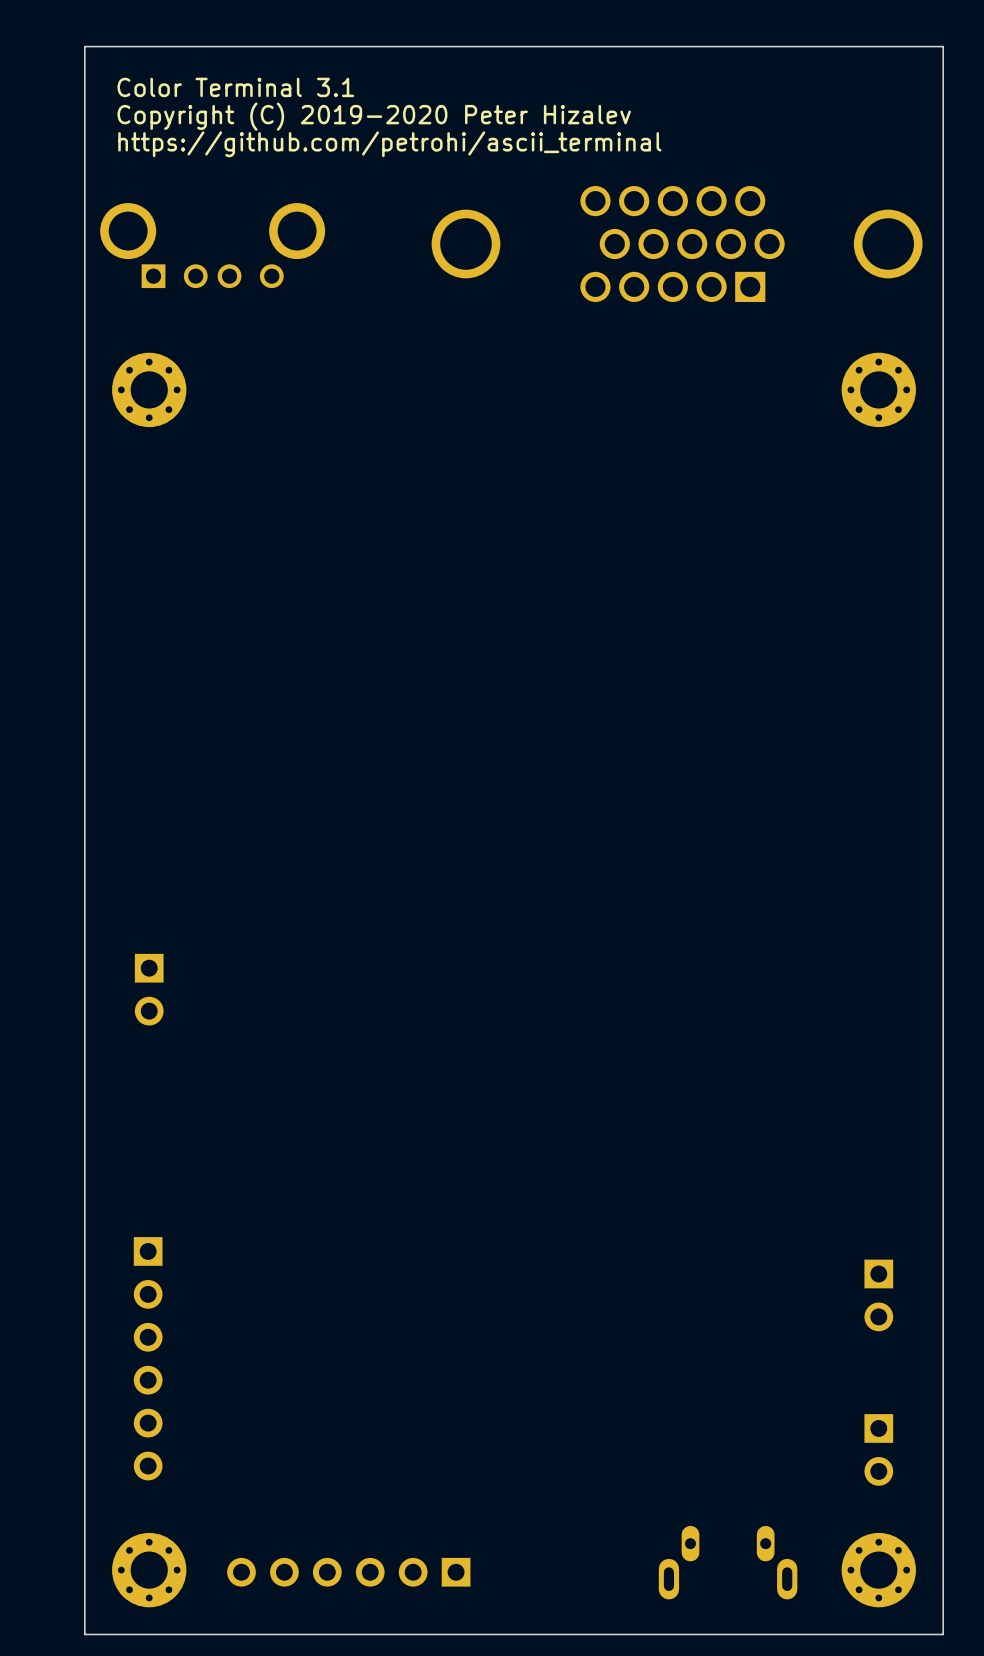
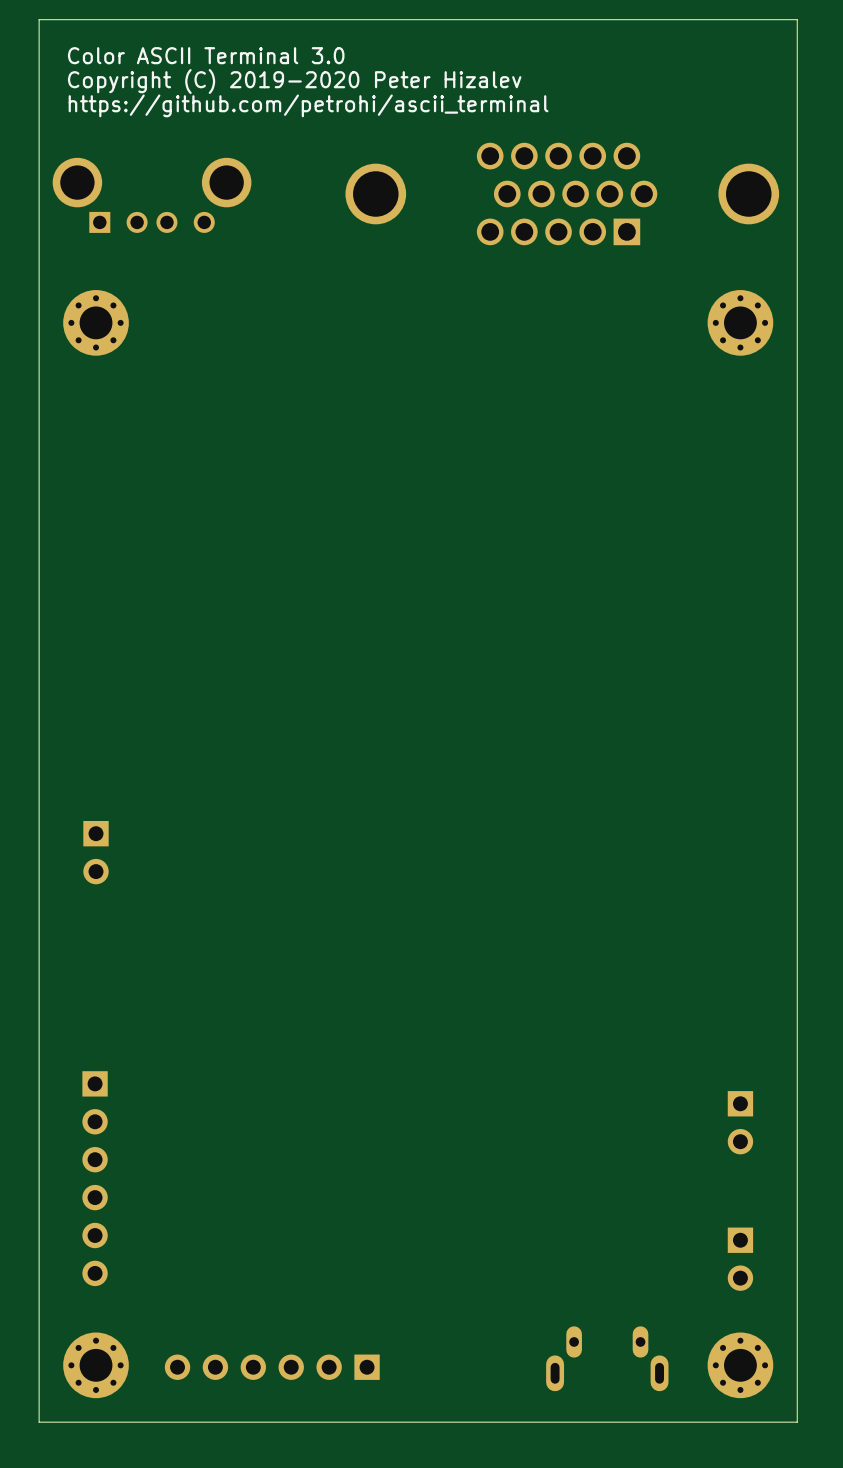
text: Color Terminal 3.1 (235, 87) -> Color ASCII Terminal 3.0 (206, 55)

